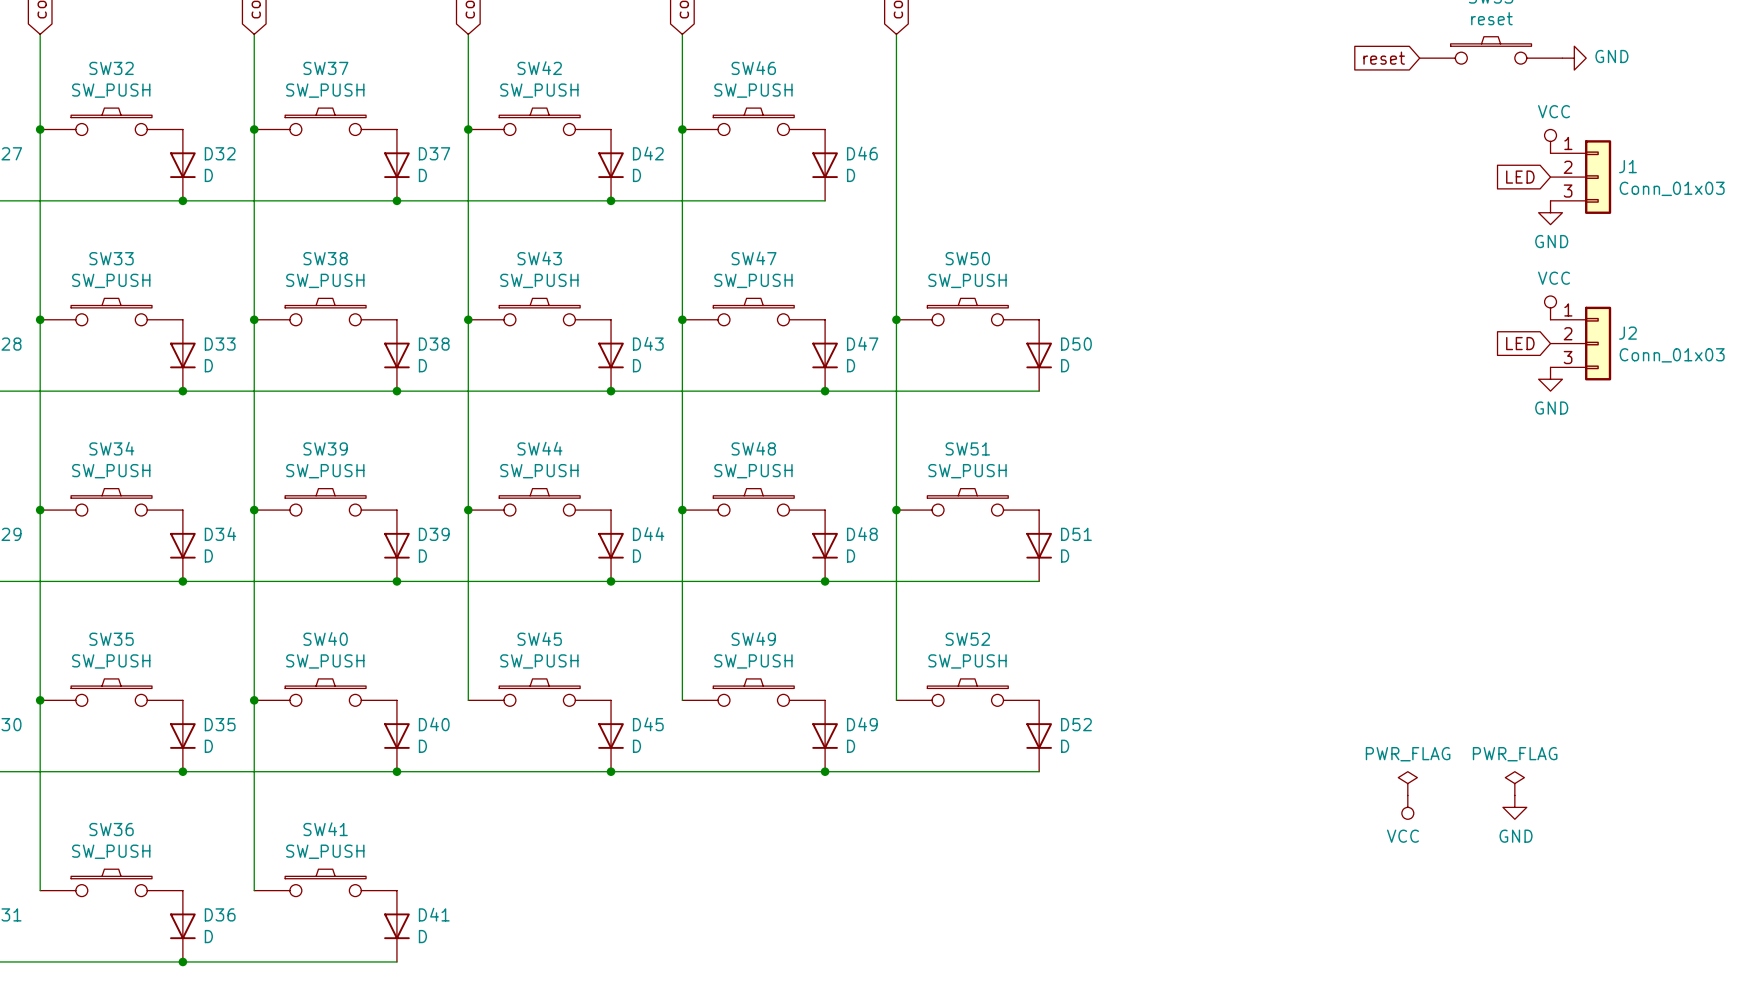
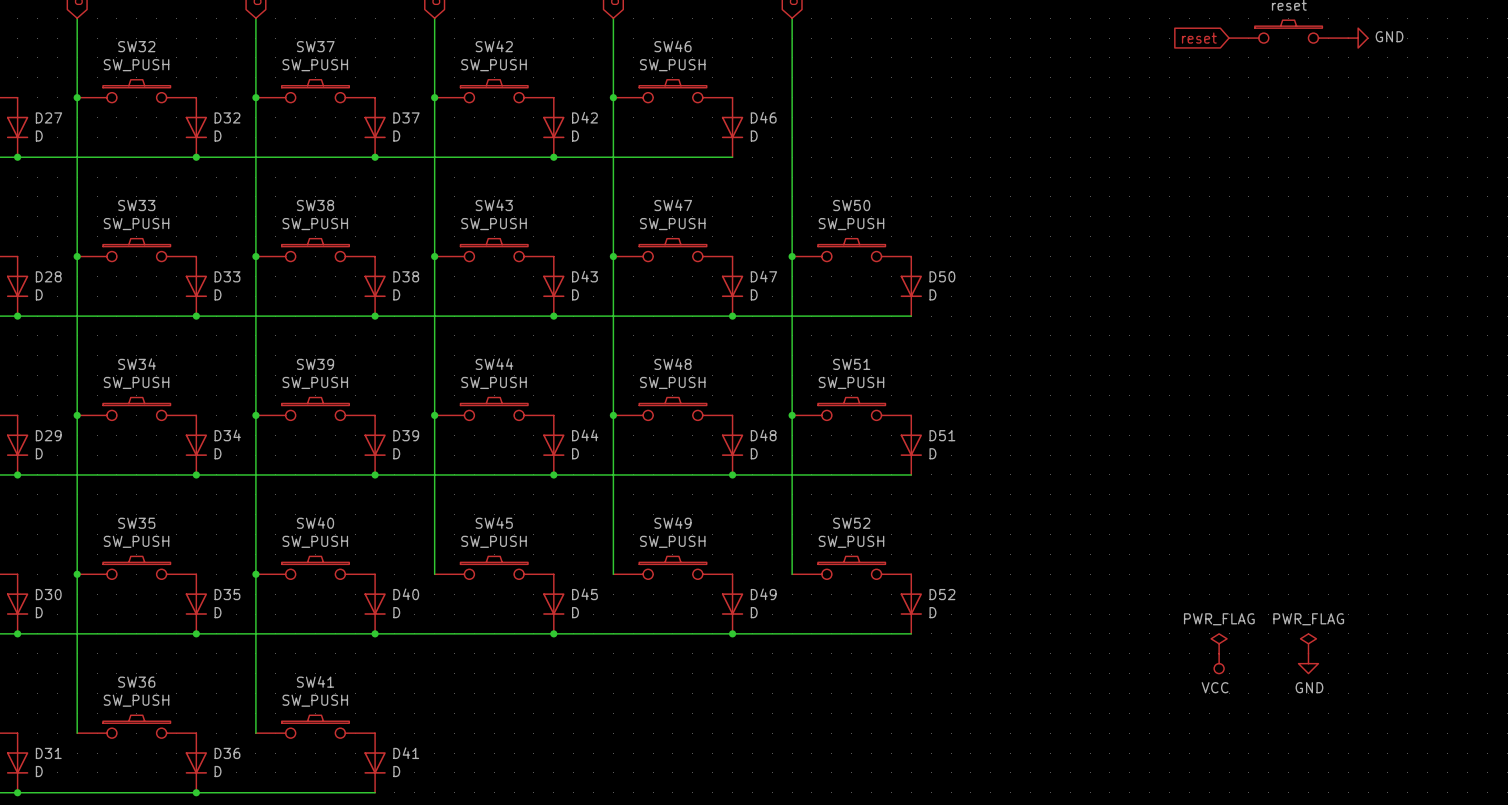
power symbol: VCC (1550, 141) -> none
global label: LED (1520, 177) -> none
J1: Conn_01x03 (1580, 177) -> none
power symbol: GND (1550, 212) -> none
power symbol: VCC (1550, 307) -> none
global label: LED (1520, 343) -> none
J2: Conn_01x03 (1580, 343) -> none
power symbol: GND (1550, 379) -> none

